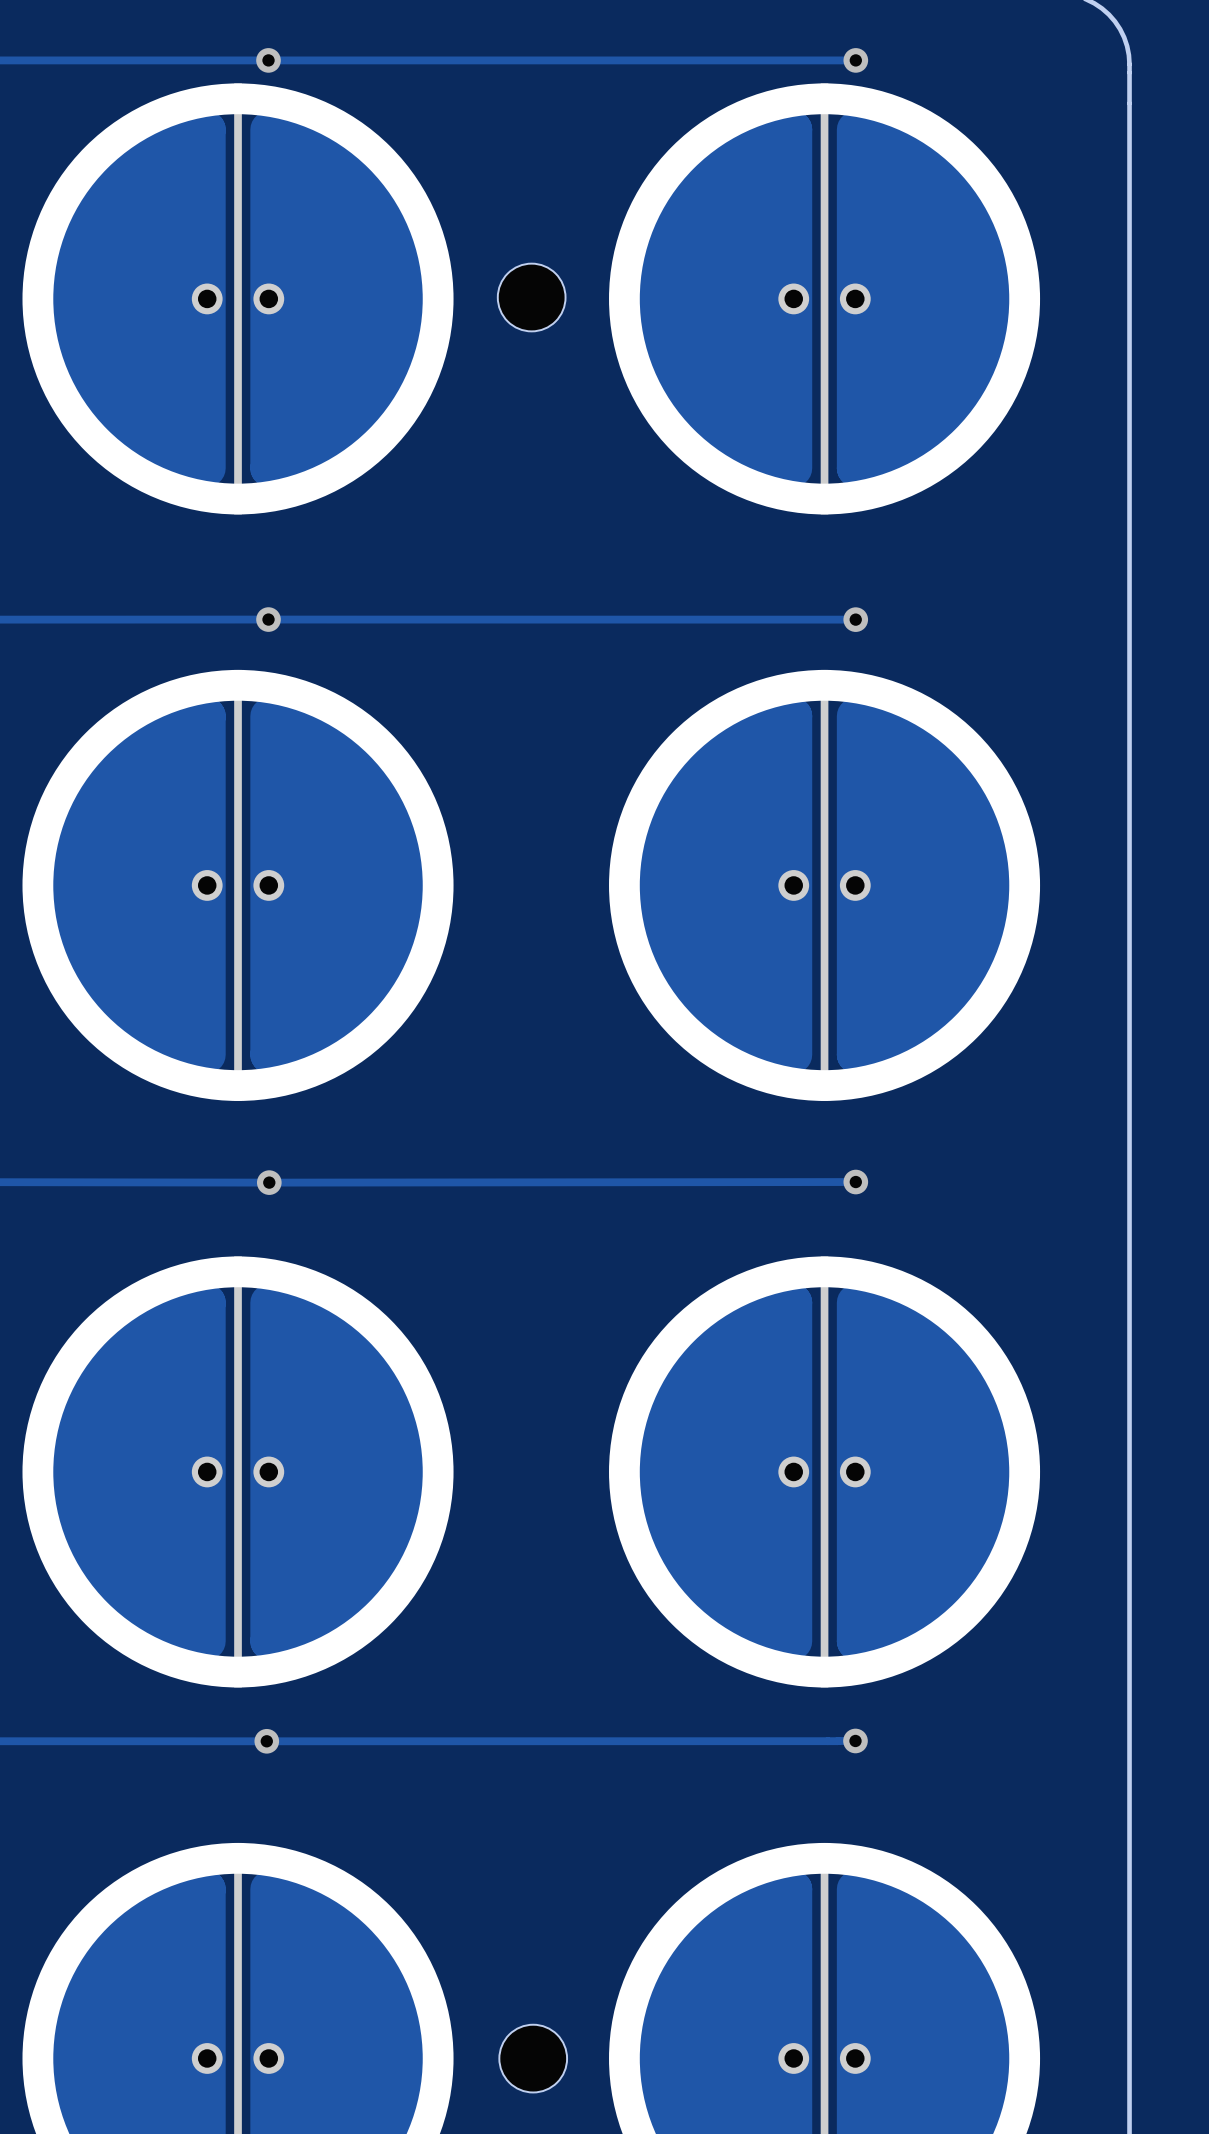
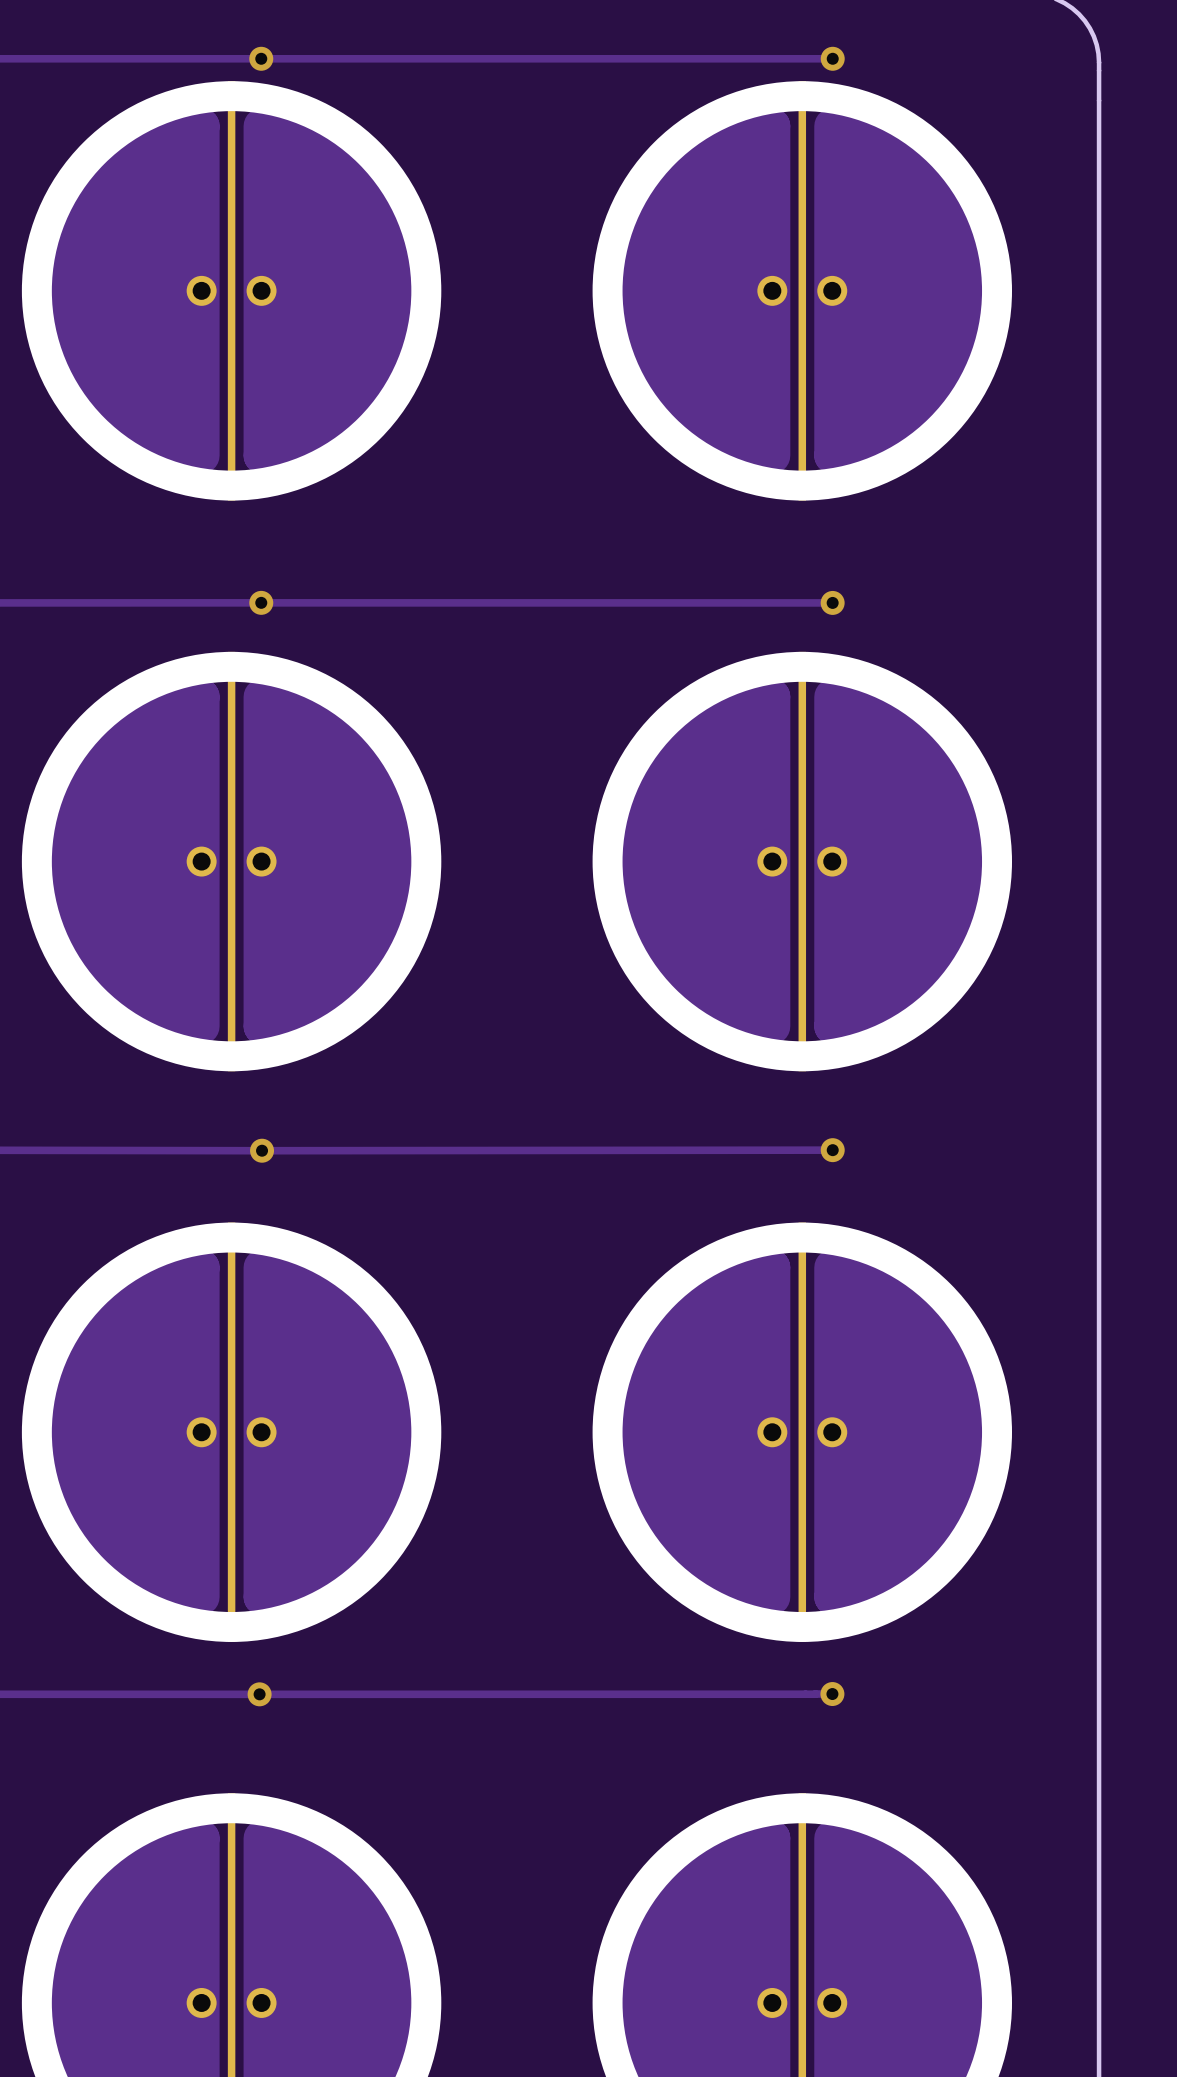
part: (531, 297) -> none
part: (533, 2058) -> none

